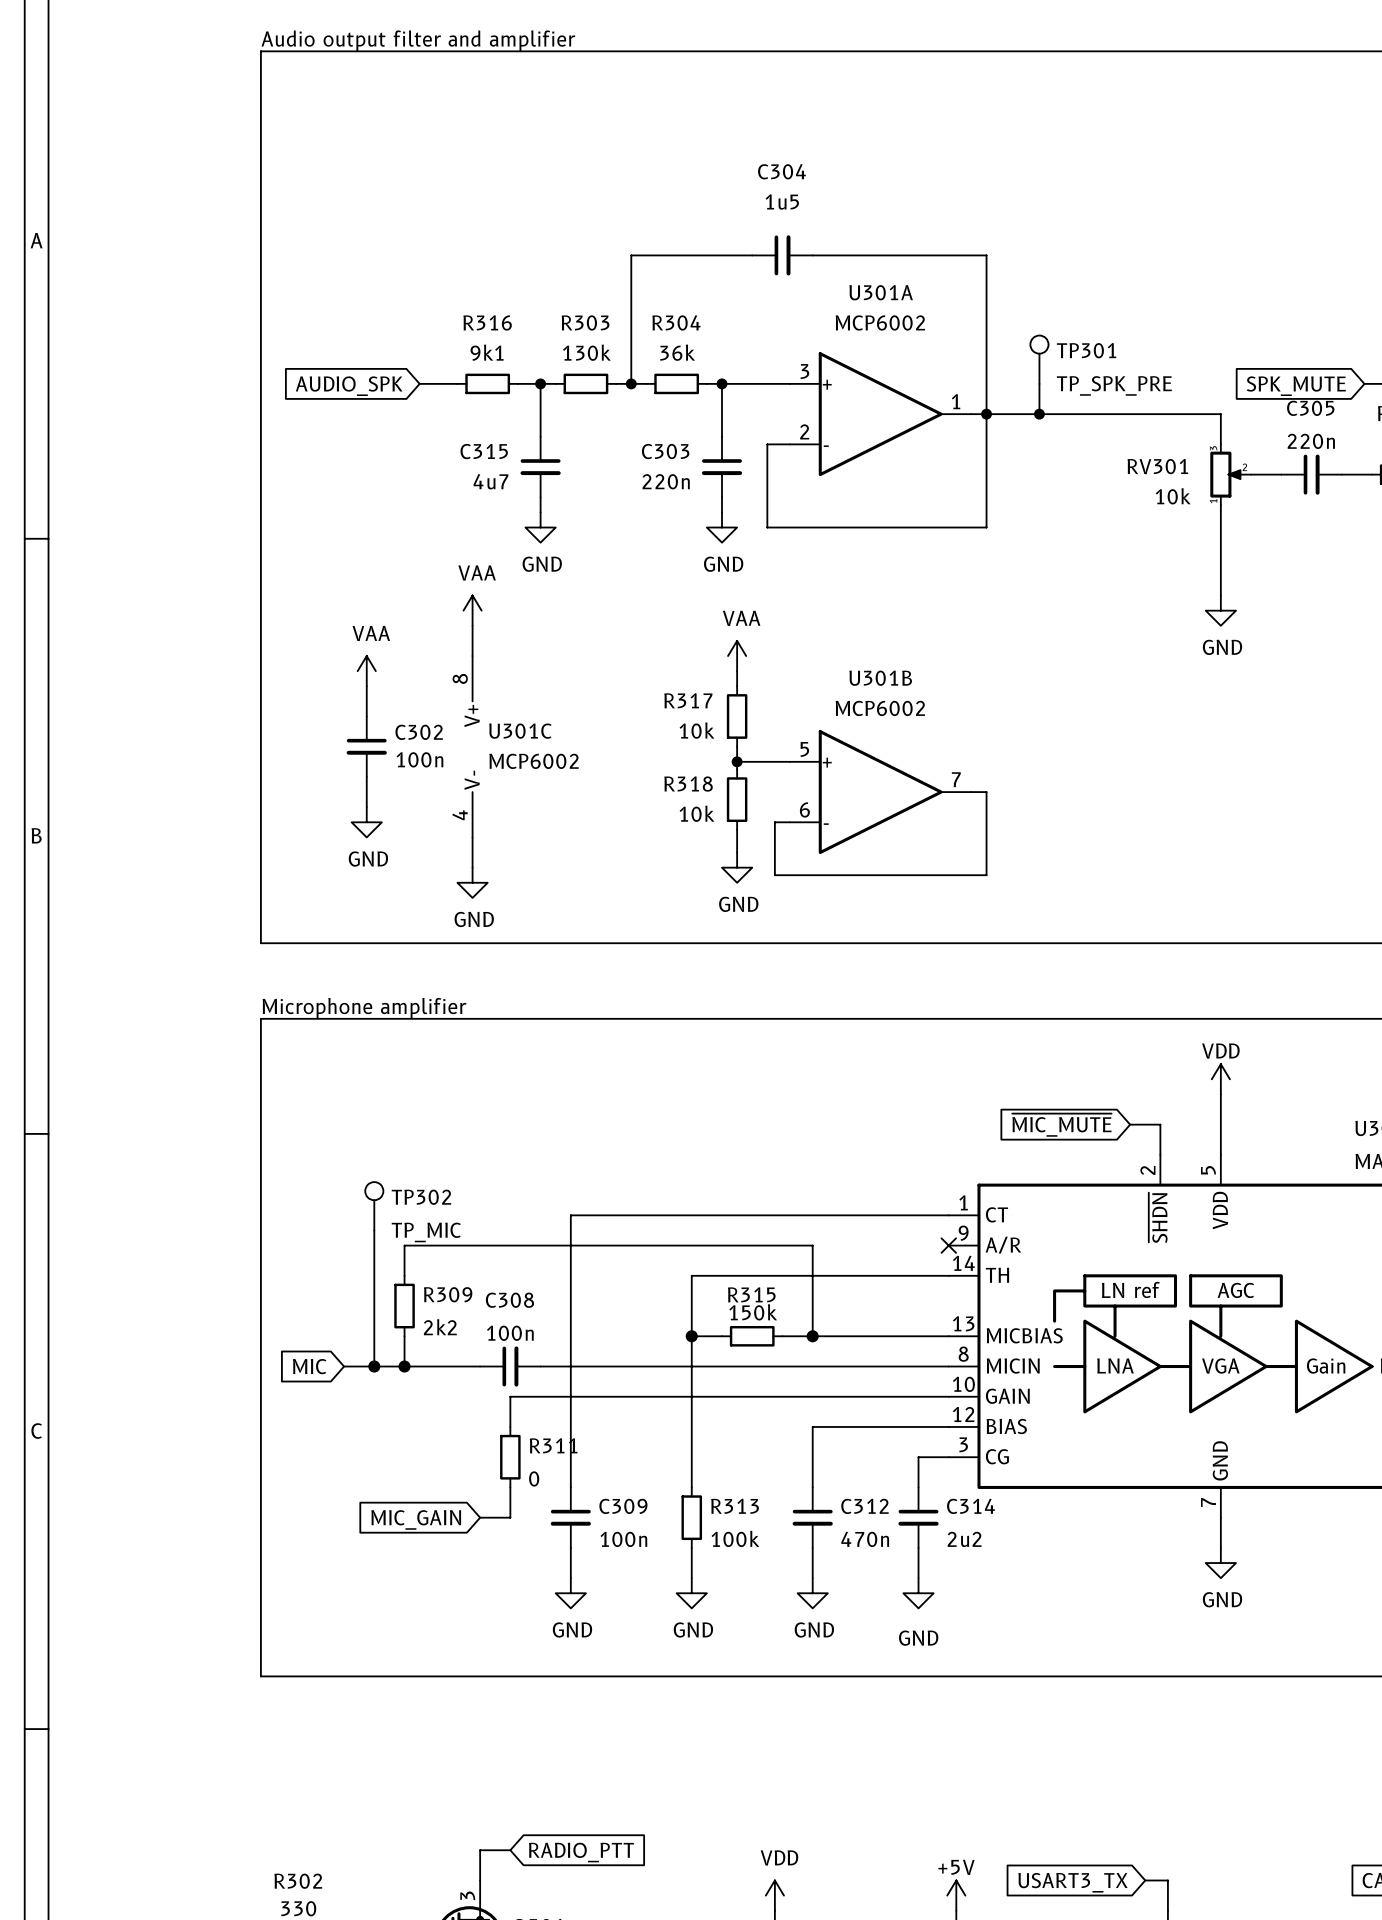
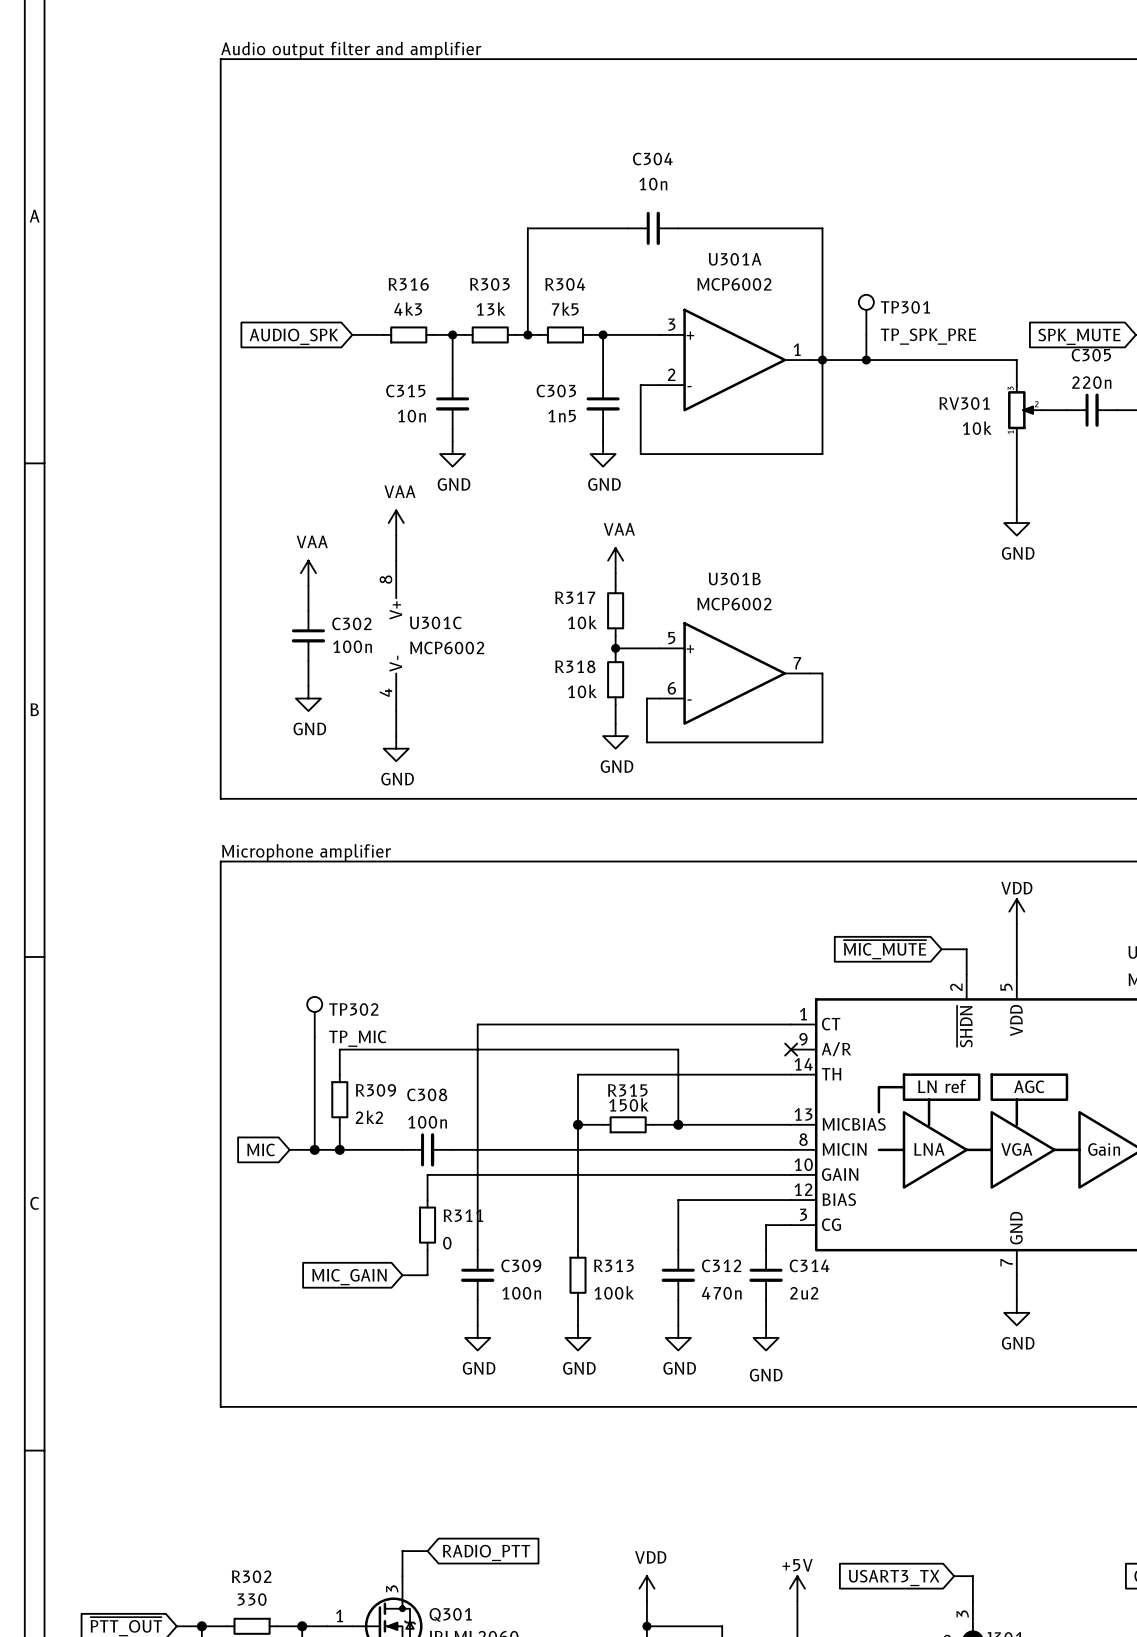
C304 value: 1u5 (782, 202) -> 10n (653, 184)
R316 value: 9k1 (487, 352) -> 4k3 (408, 308)
R303 value: 130k (586, 352) -> 13k (491, 308)
R304 value: 36k (677, 352) -> 7k5 (565, 308)
C315 value: 4u7 (490, 481) -> 10n (411, 416)
C303 value: 220n (666, 481) -> 1n5 (562, 416)

